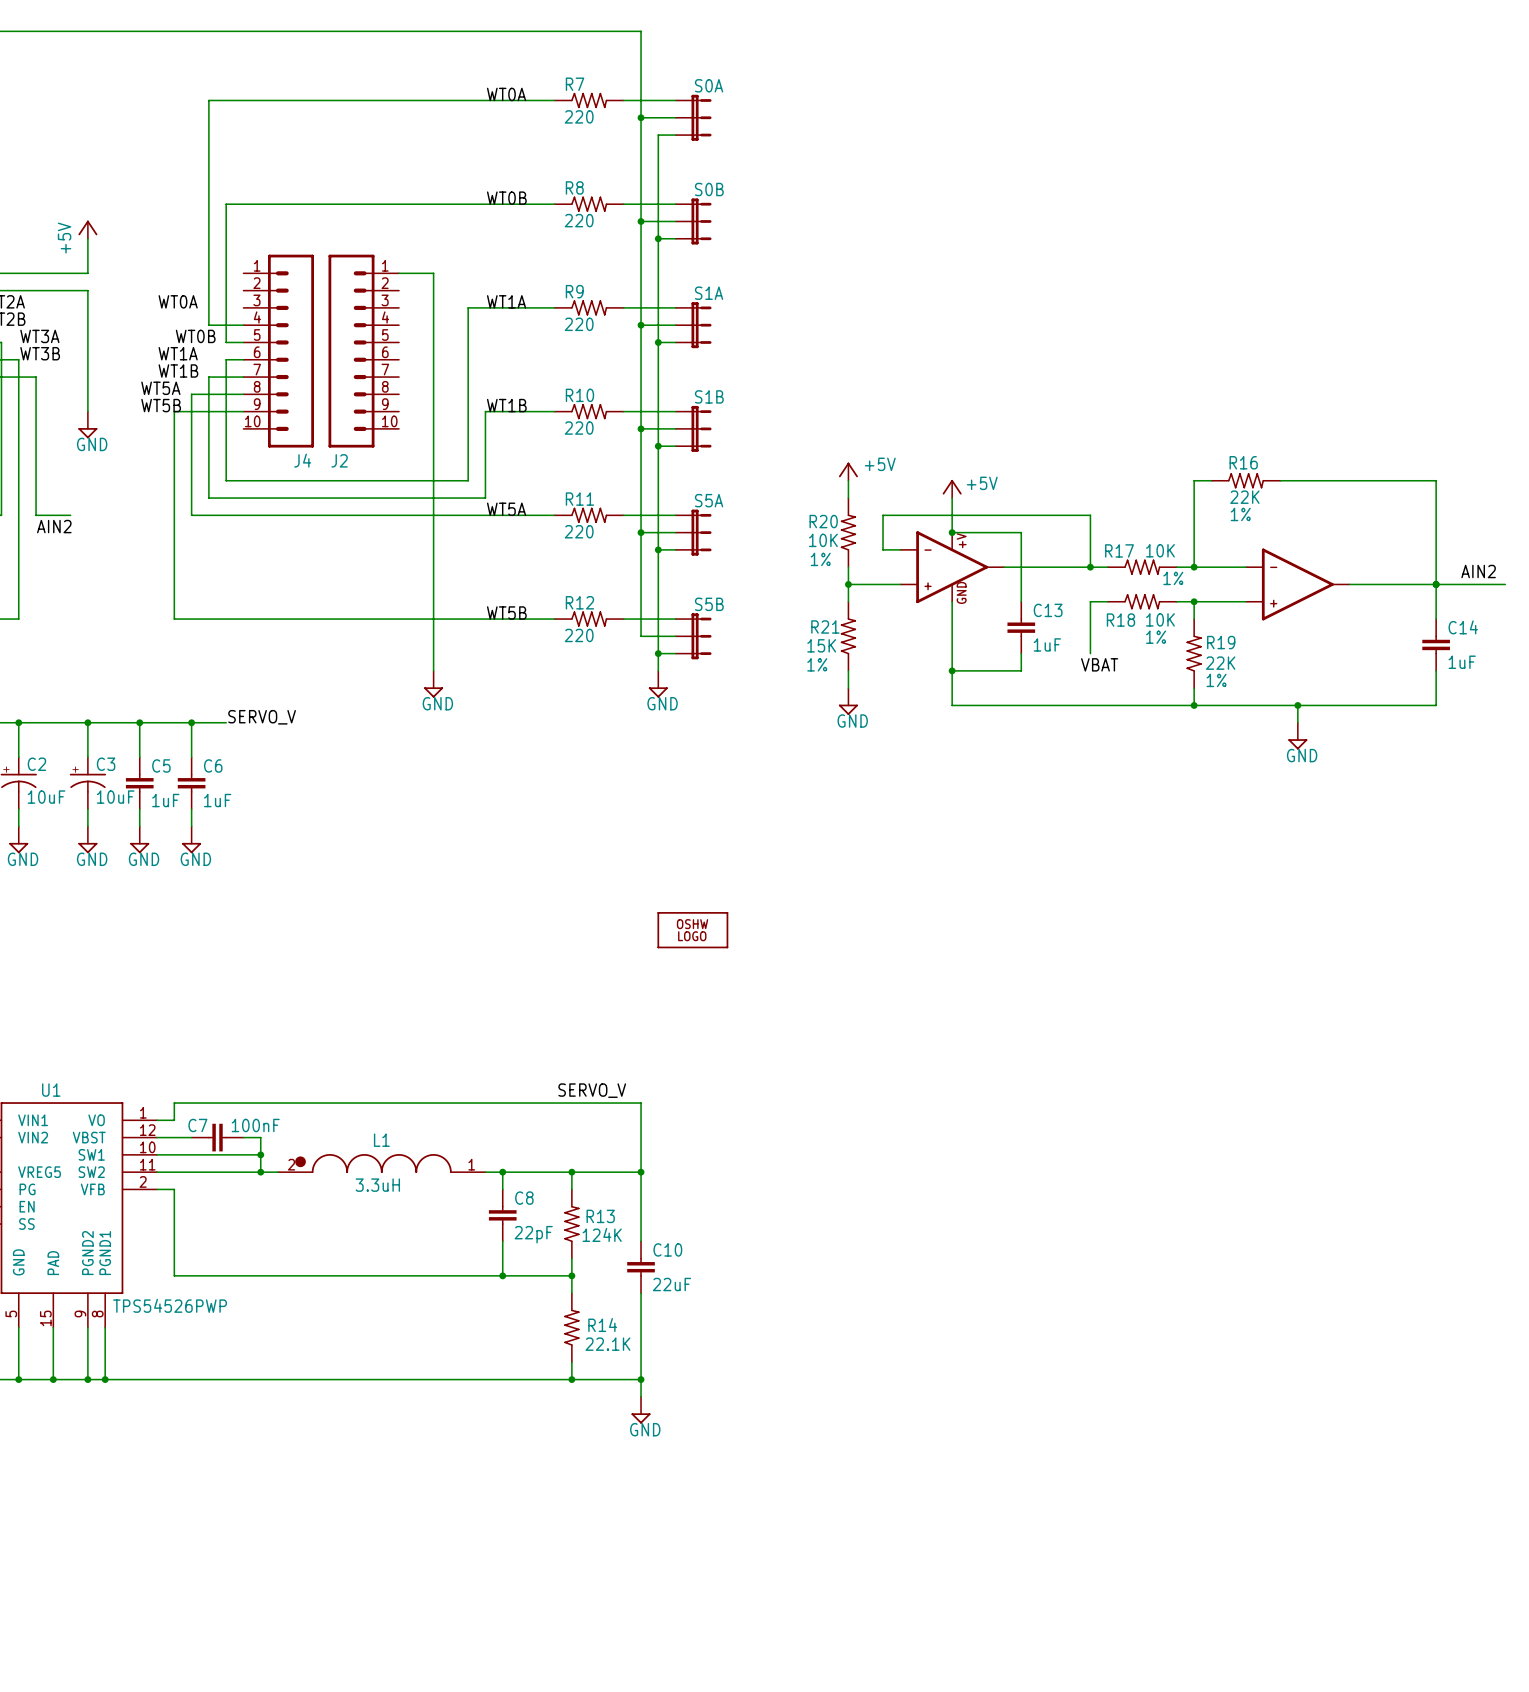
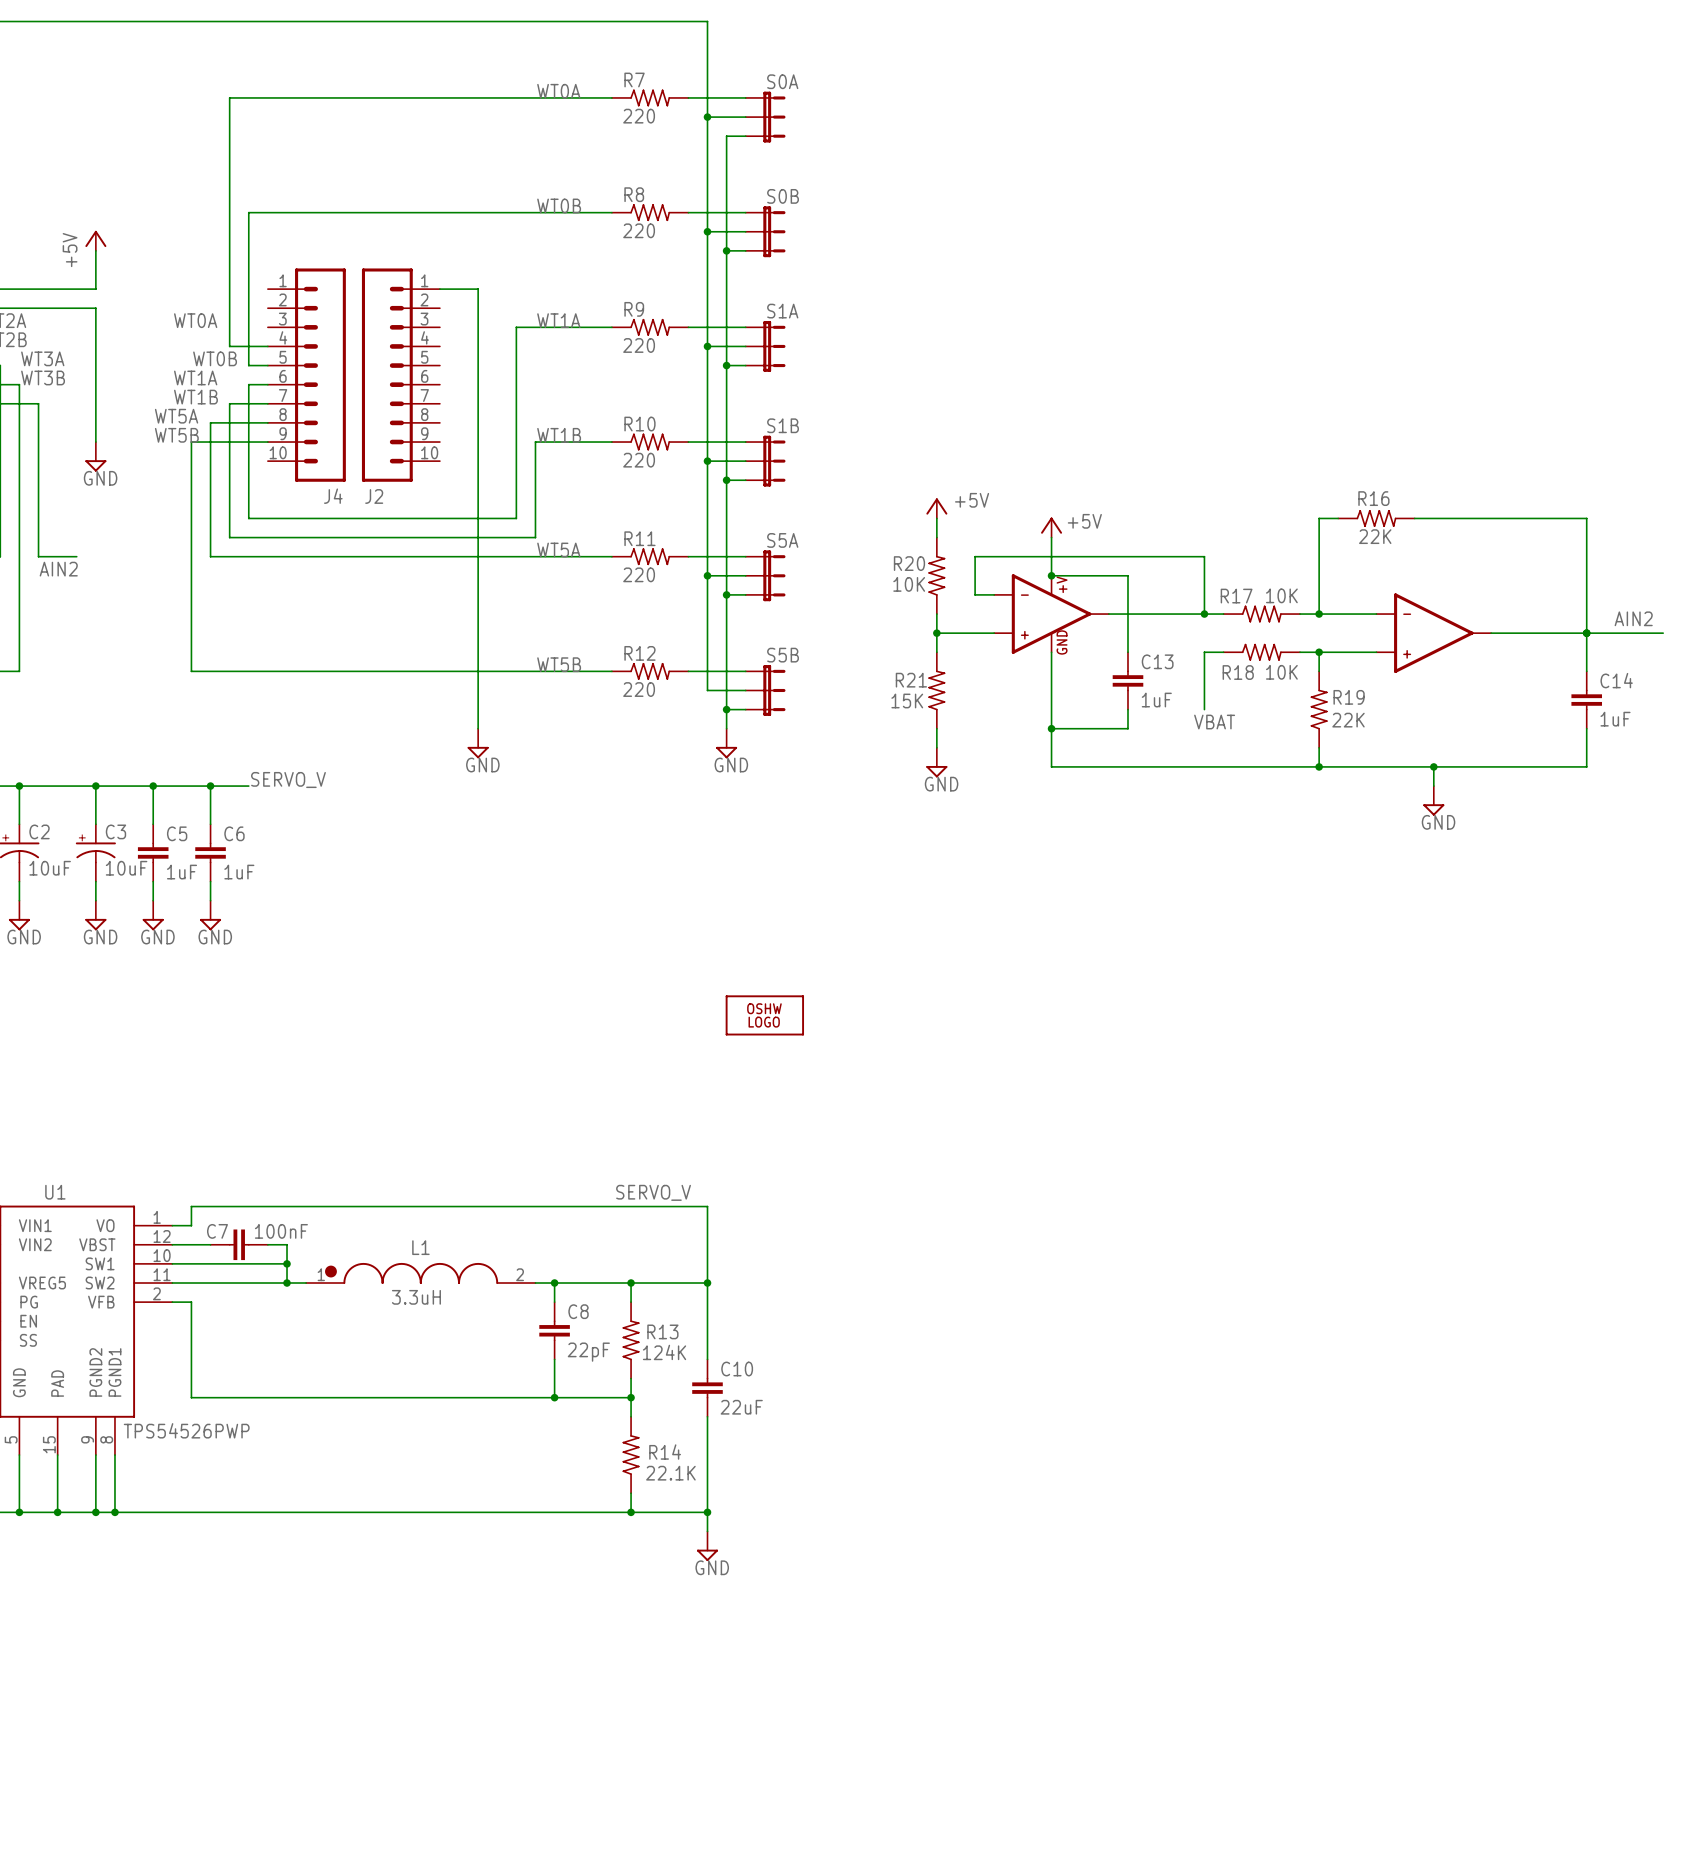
R16 text: 1% (1240, 514) -> none
R20 text: 1% (820, 559) -> none
R17 text: 1% (1173, 578) -> none
R18 text: 1% (1156, 637) -> none
R21 text: 1% (817, 664) -> none
R19 text: 1% (1216, 680) -> none
L1 pin number: 2 (291, 1164) -> 1 (321, 1274)
L1 pin number: 1 (471, 1164) -> 2 (520, 1274)

